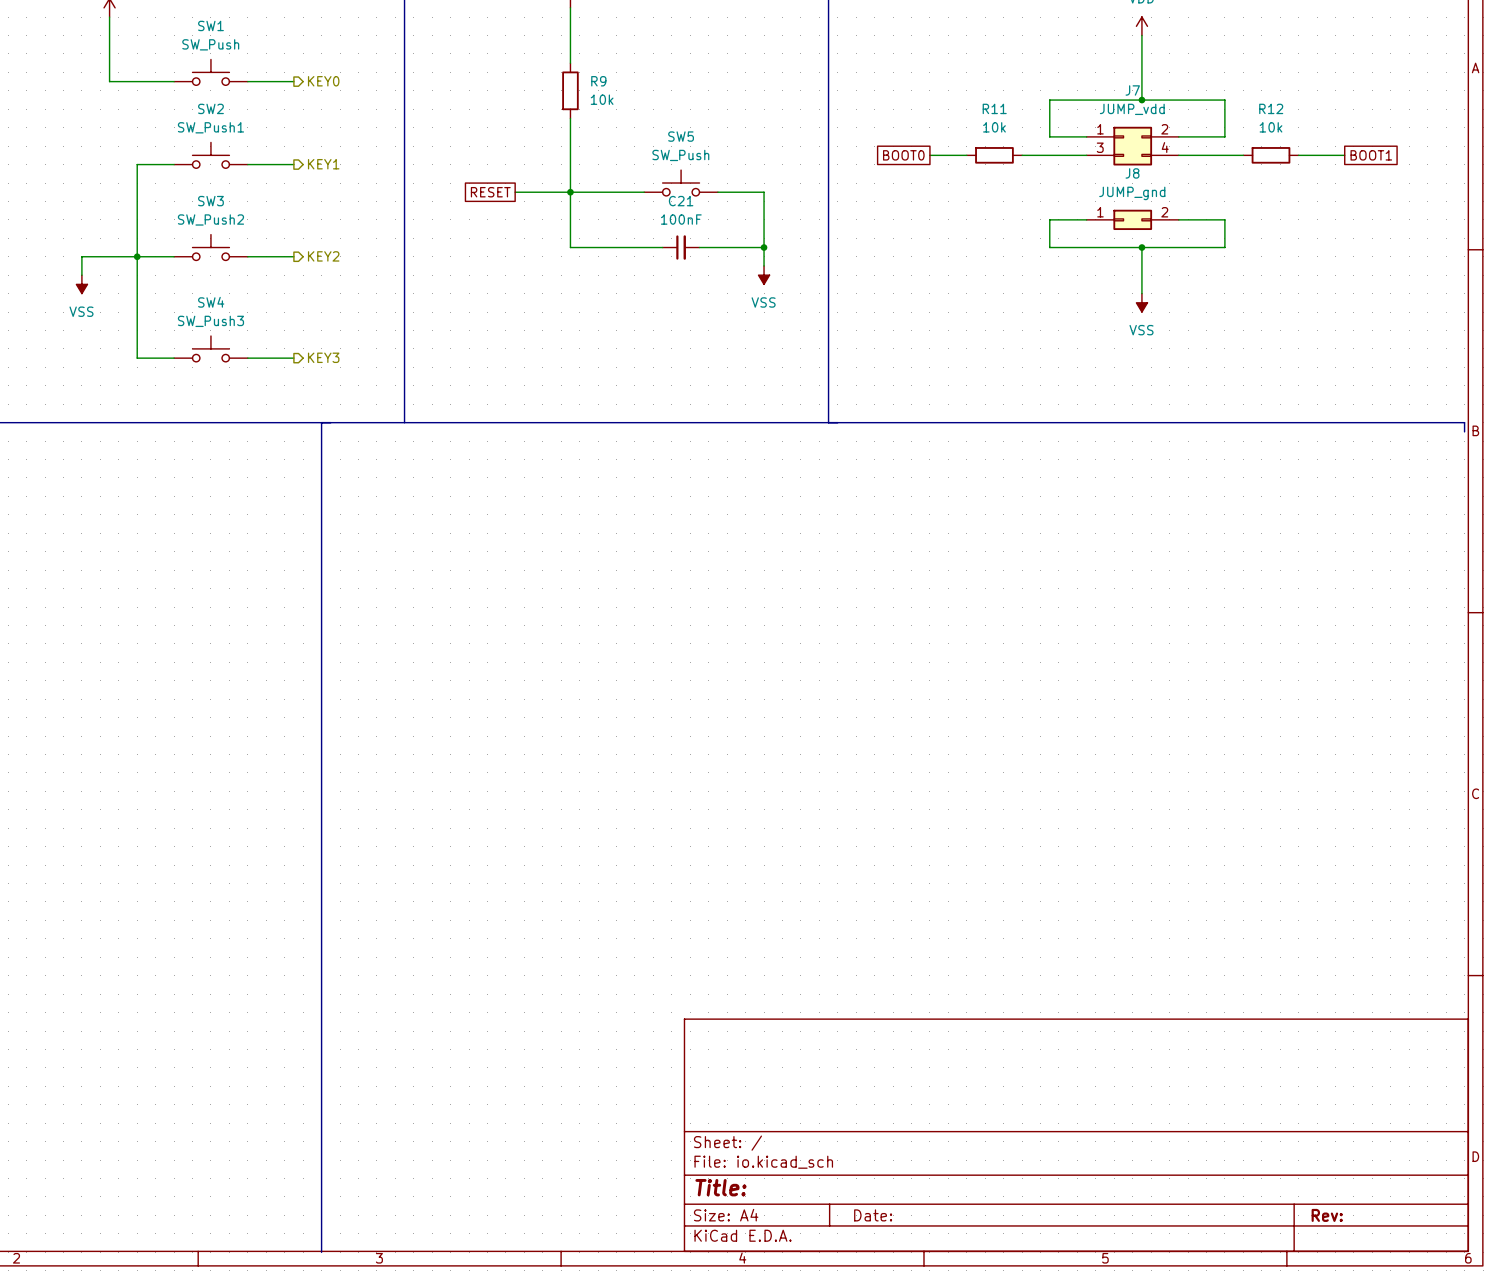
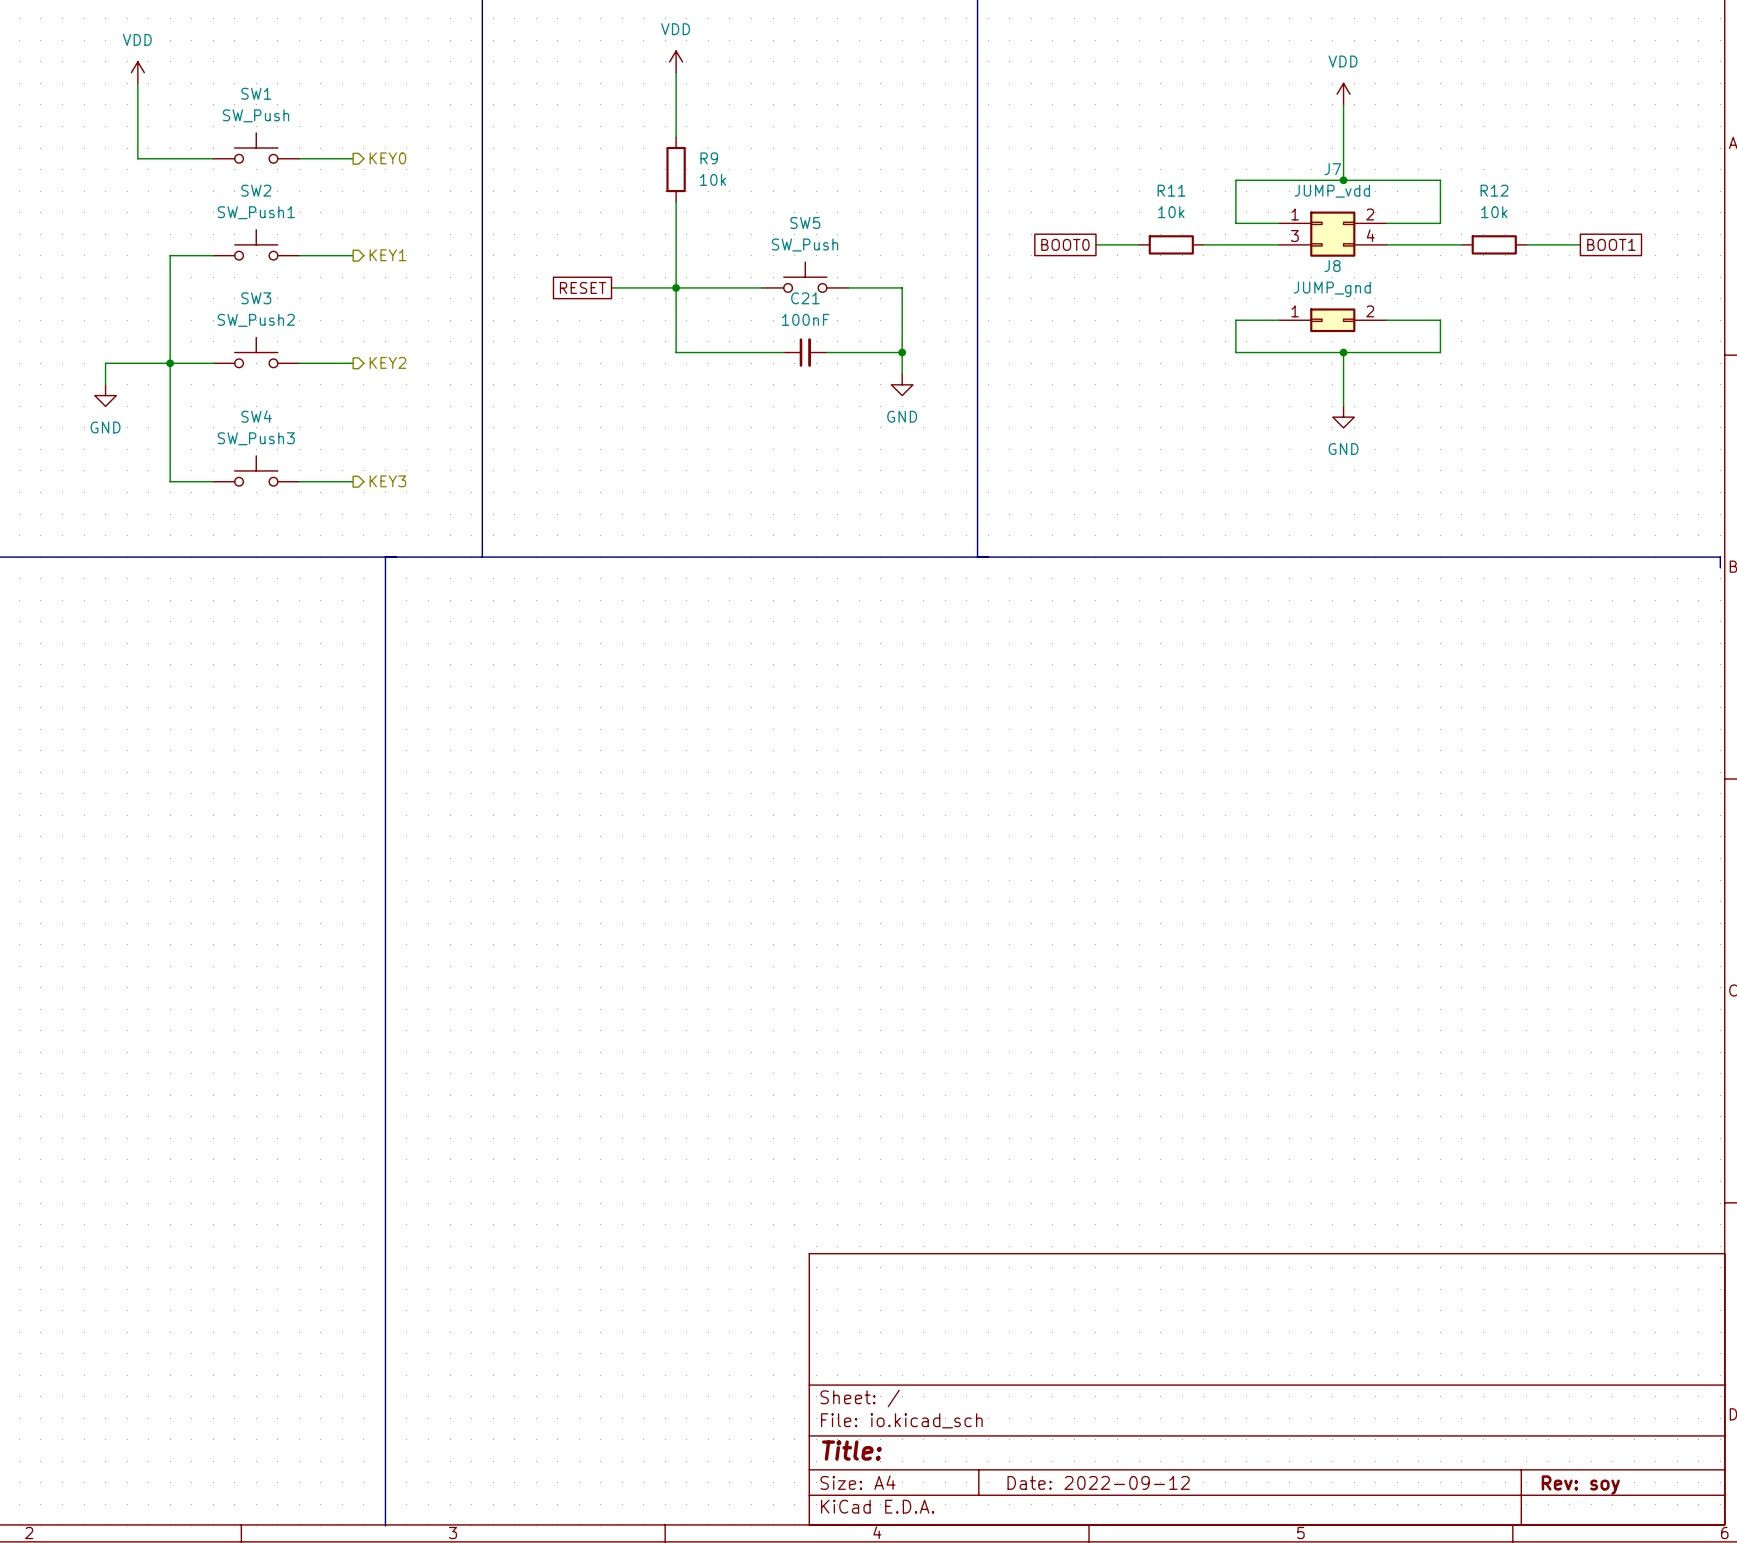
power symbol: VSS (764, 275) -> GND (902, 384)
power symbol: VSS (81, 284) -> GND (105, 395)
power symbol: VSS (1141, 302) -> GND (1343, 417)
title block: Date: (873, 1215) -> Date: 2022-09-12 (1098, 1482)
title block: Rev: (1327, 1215) -> Rev: soy (1580, 1485)

